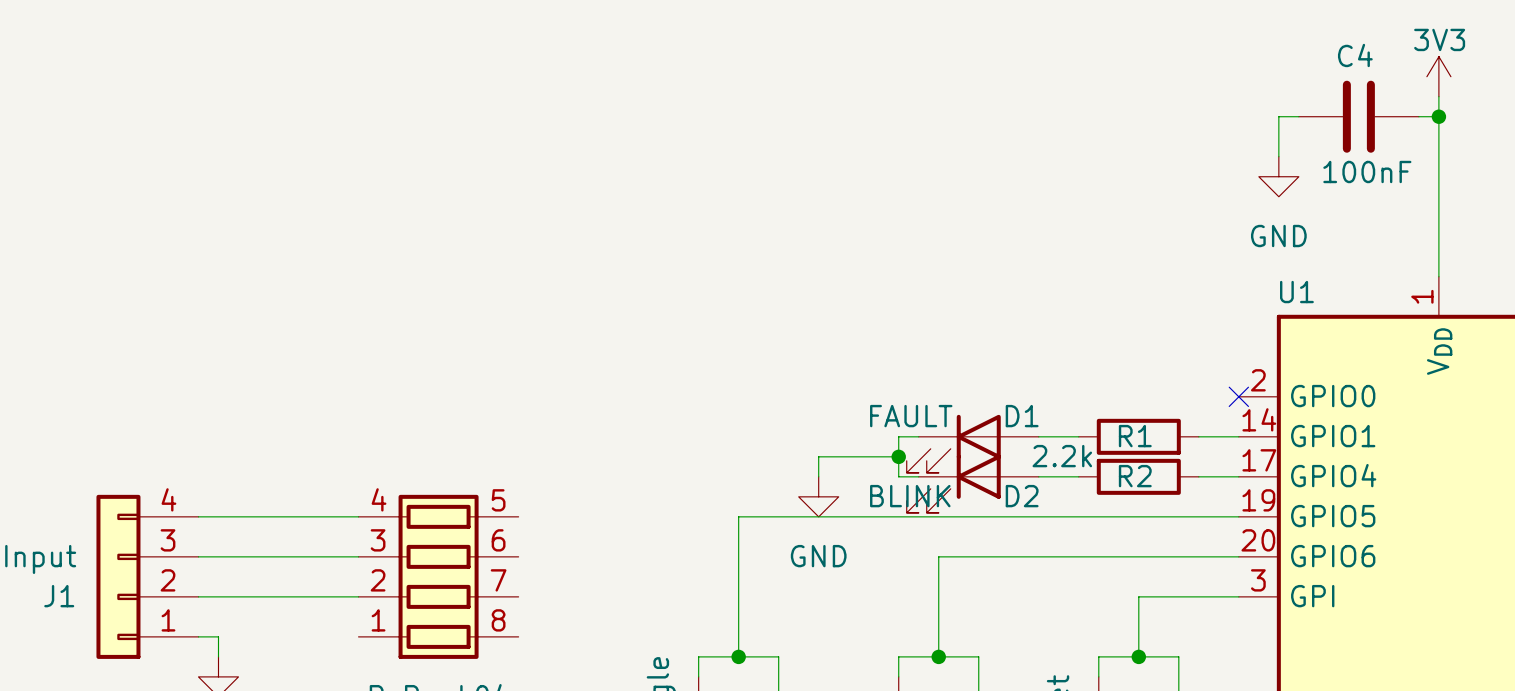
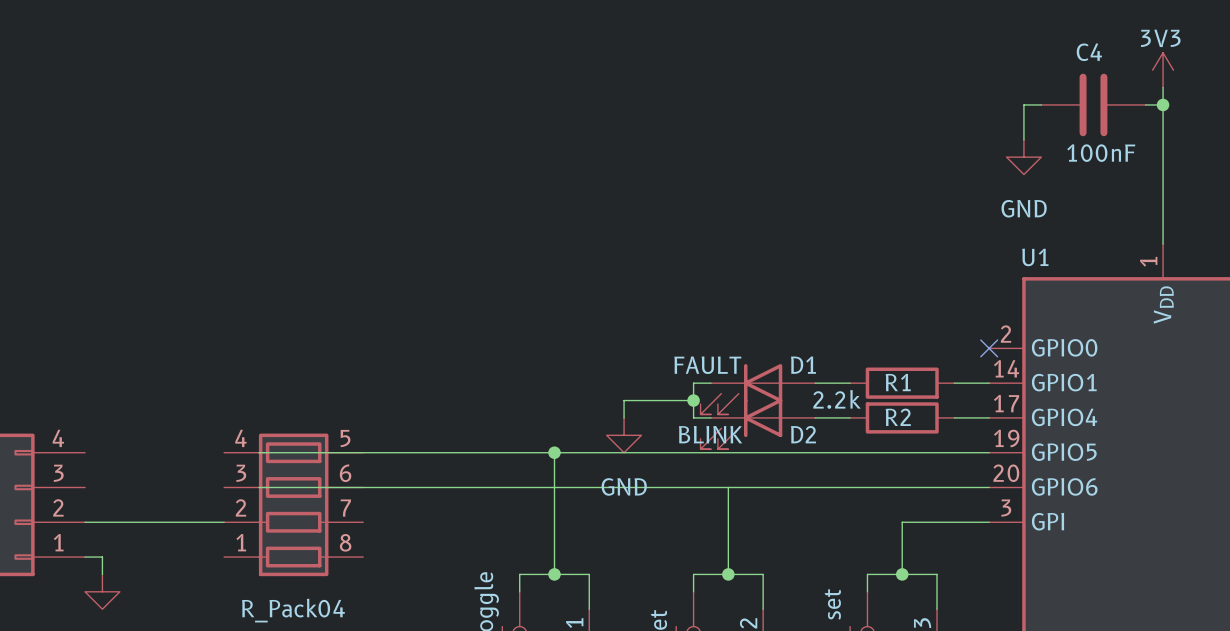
wire: (198, 516) (358, 516) -> none
wire: none -> (258, 452) (554, 452)
junction: none -> (554, 452)
wire: (198, 556) (358, 556) -> none
wire: none -> (258, 487) (728, 487)

